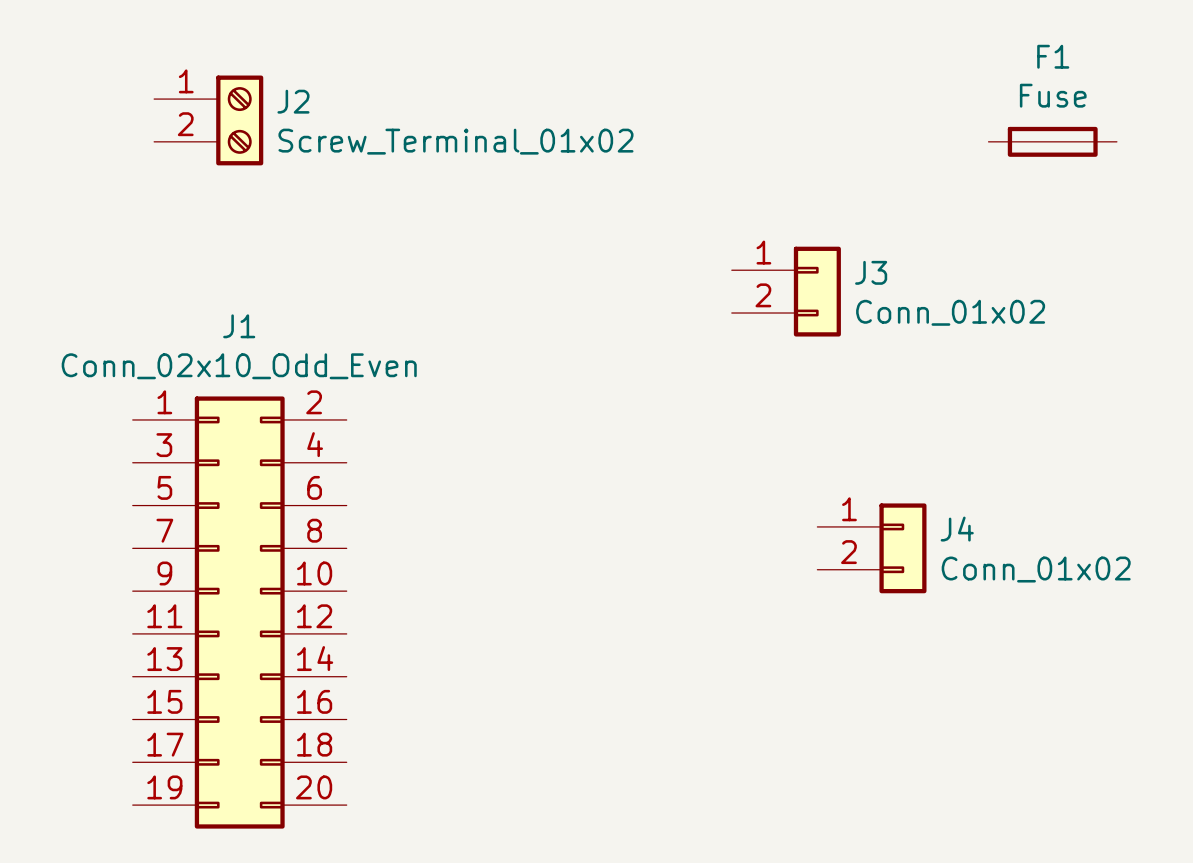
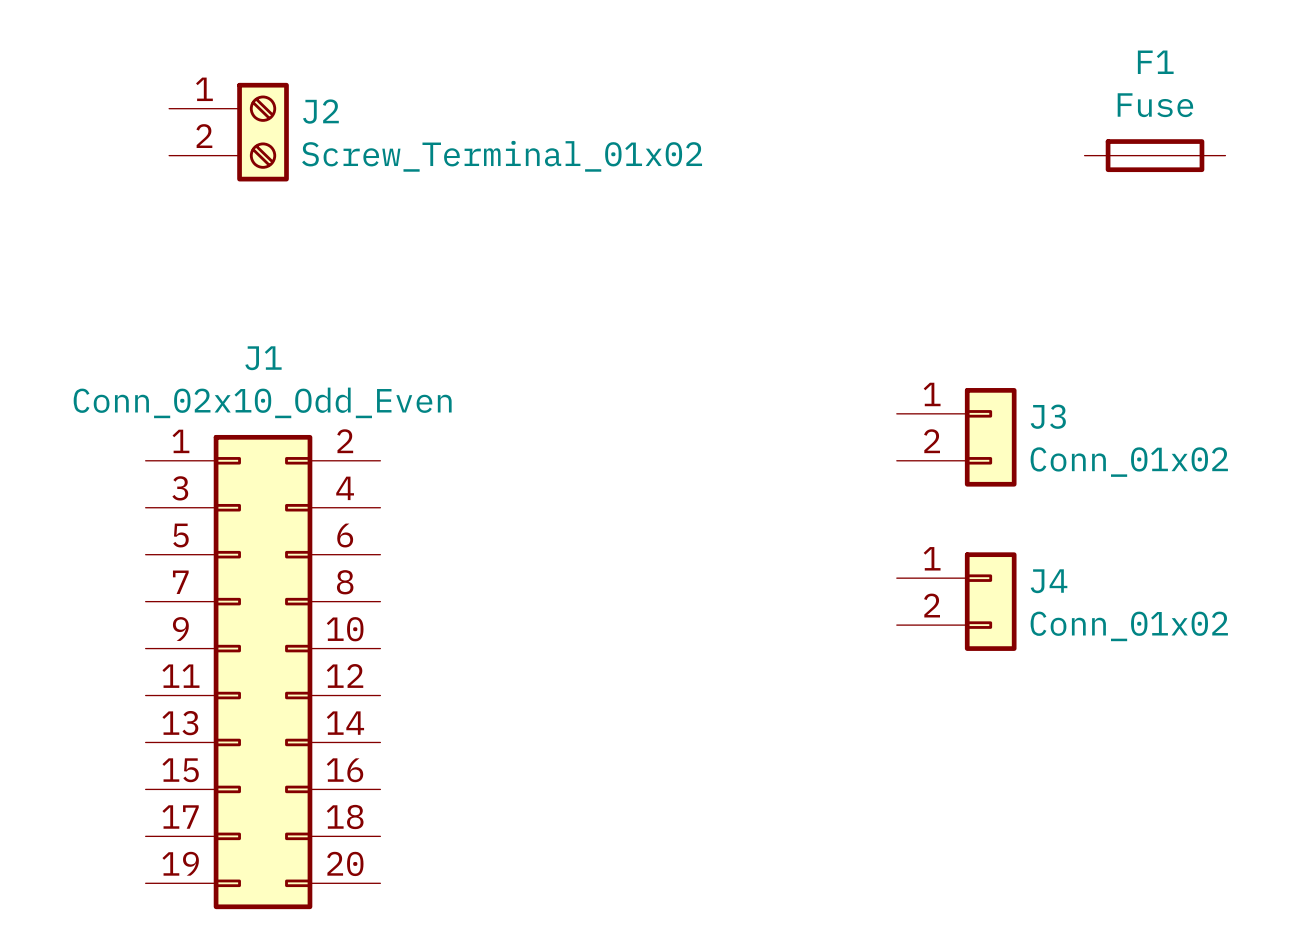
J3 position: (786, 291) -> (956, 437)

